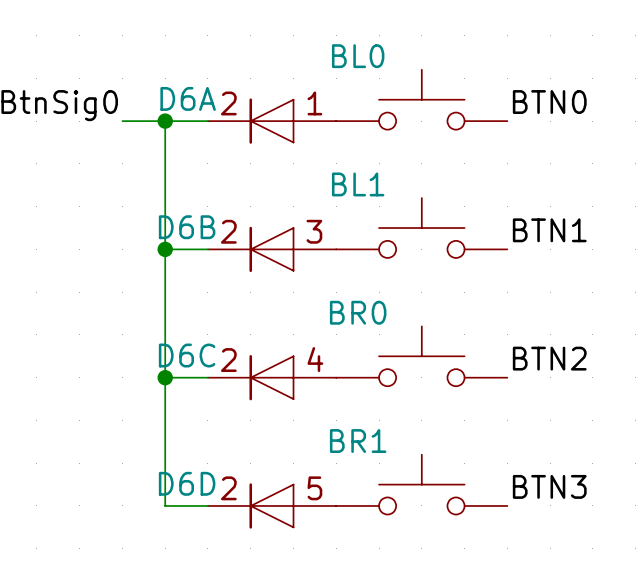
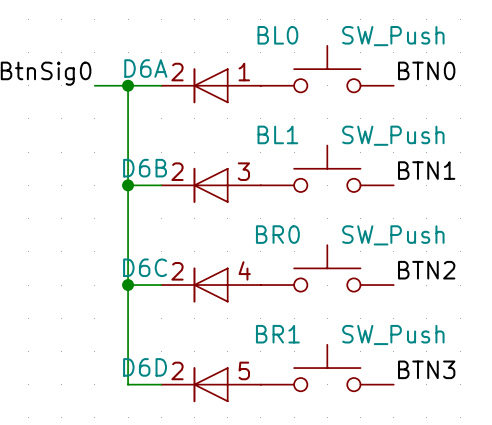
BL0 value: none -> SW_Push (393, 36)
BL1 value: none -> SW_Push (393, 135)
BR0 value: none -> SW_Push (393, 235)
BR1 value: none -> SW_Push (393, 334)

